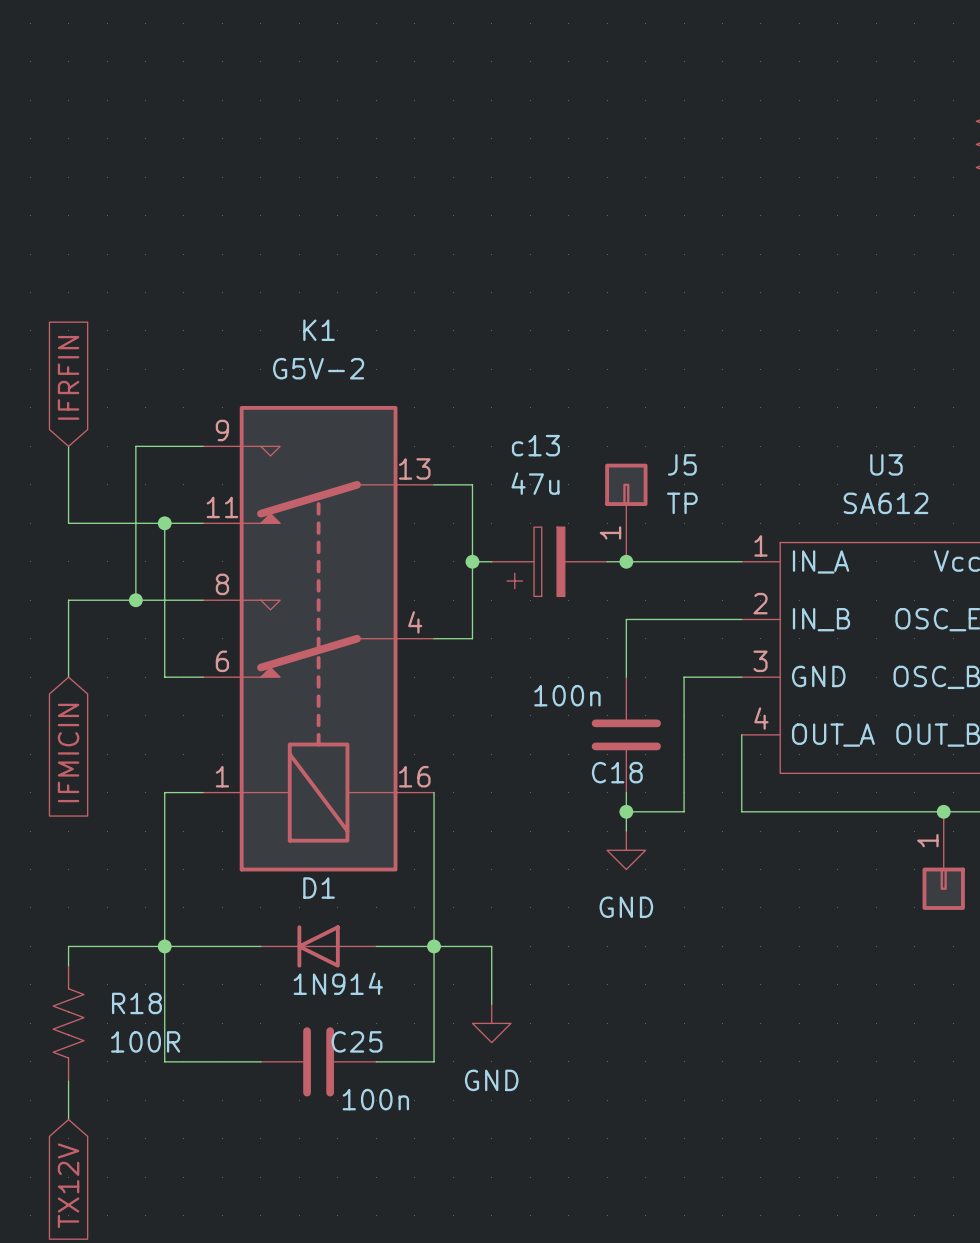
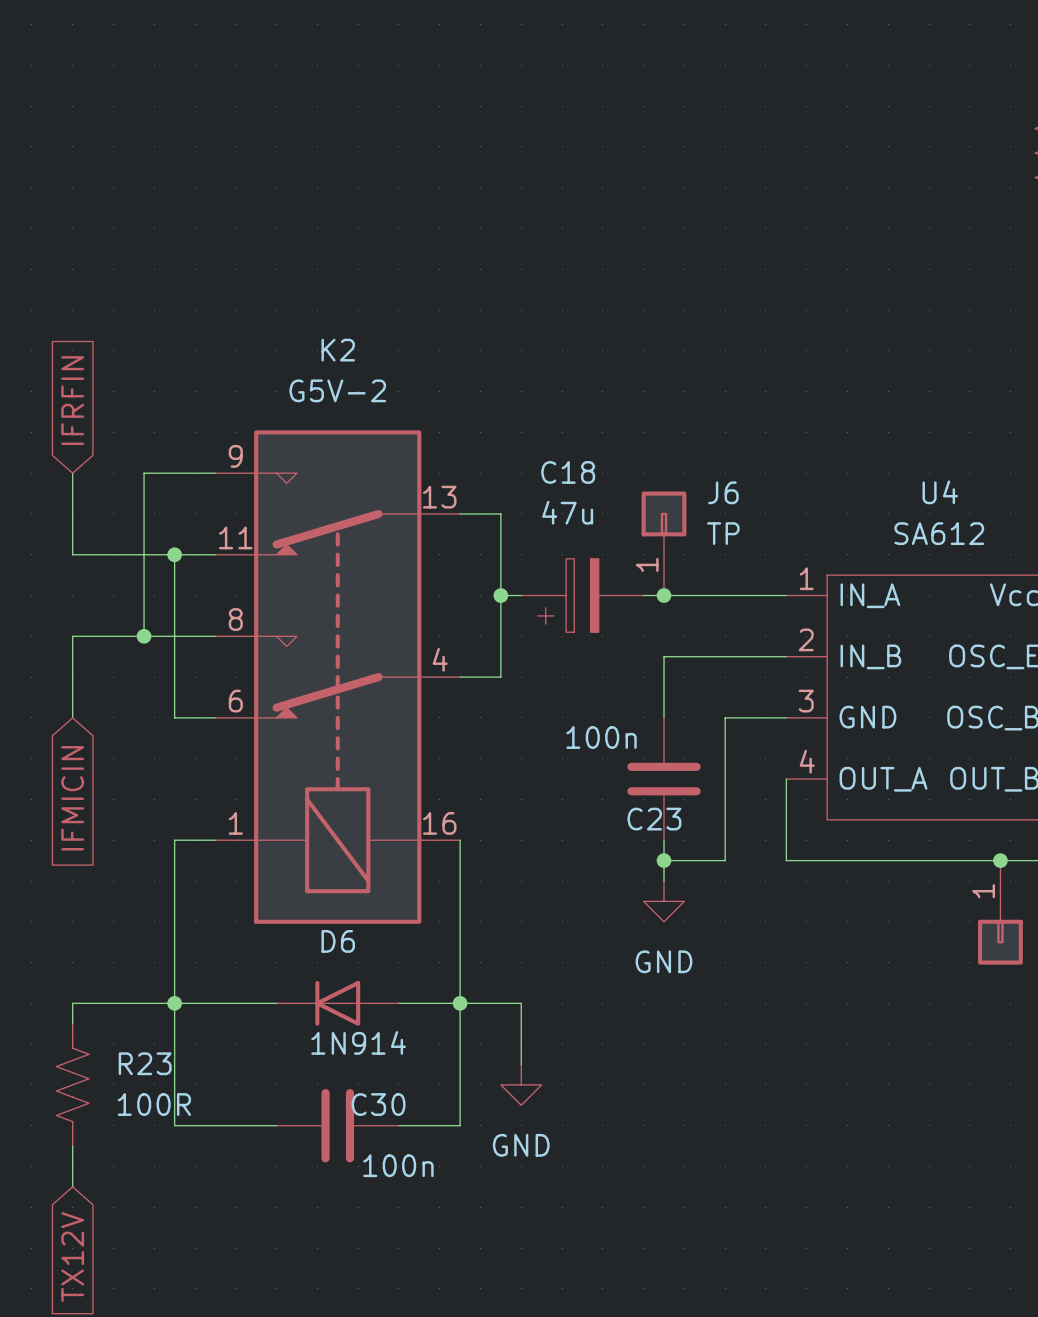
K1 name: K1 (319, 330) -> K2 (338, 350)
c13 name: c13 (535, 445) -> C18 (568, 472)
J5 name: J5 (682, 464) -> J6 (723, 492)
U3 name: U3 (886, 464) -> U4 (940, 492)
C18 name: C18 (617, 772) -> C23 (654, 819)
D1 name: D1 (319, 888) -> D6 (338, 941)
R18 name: R18 (136, 1003) -> R23 (145, 1063)
C25 name: C25 (357, 1041) -> C30 (378, 1104)

